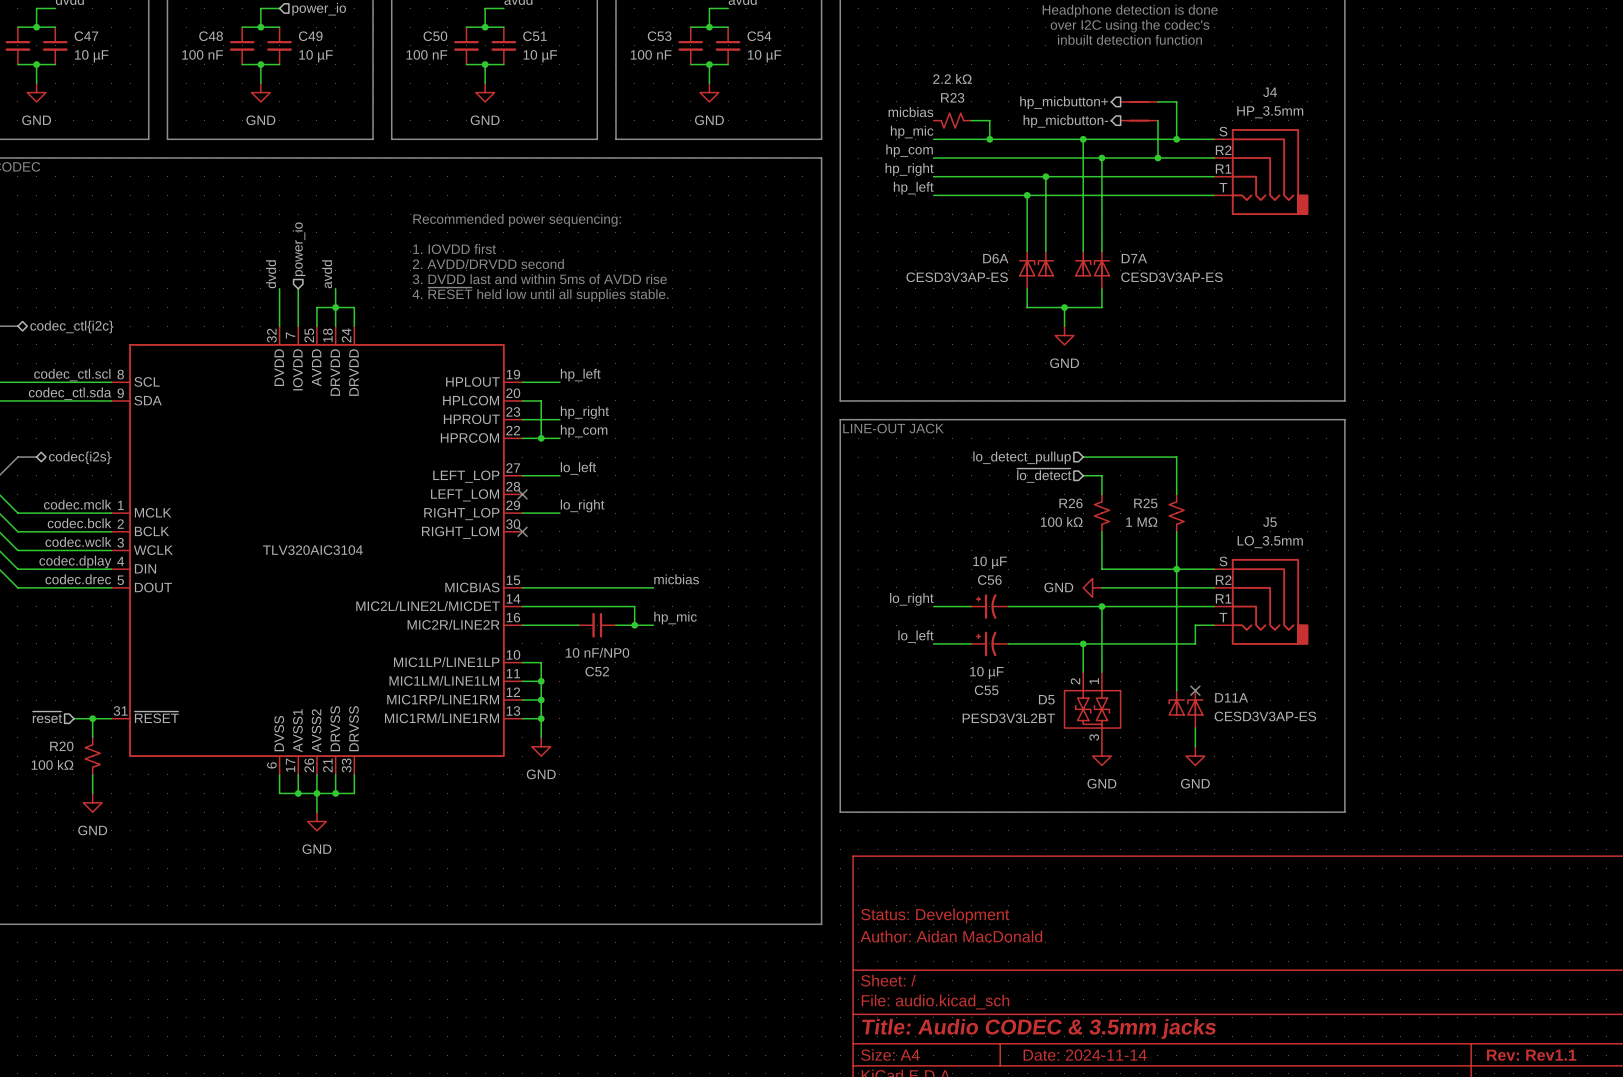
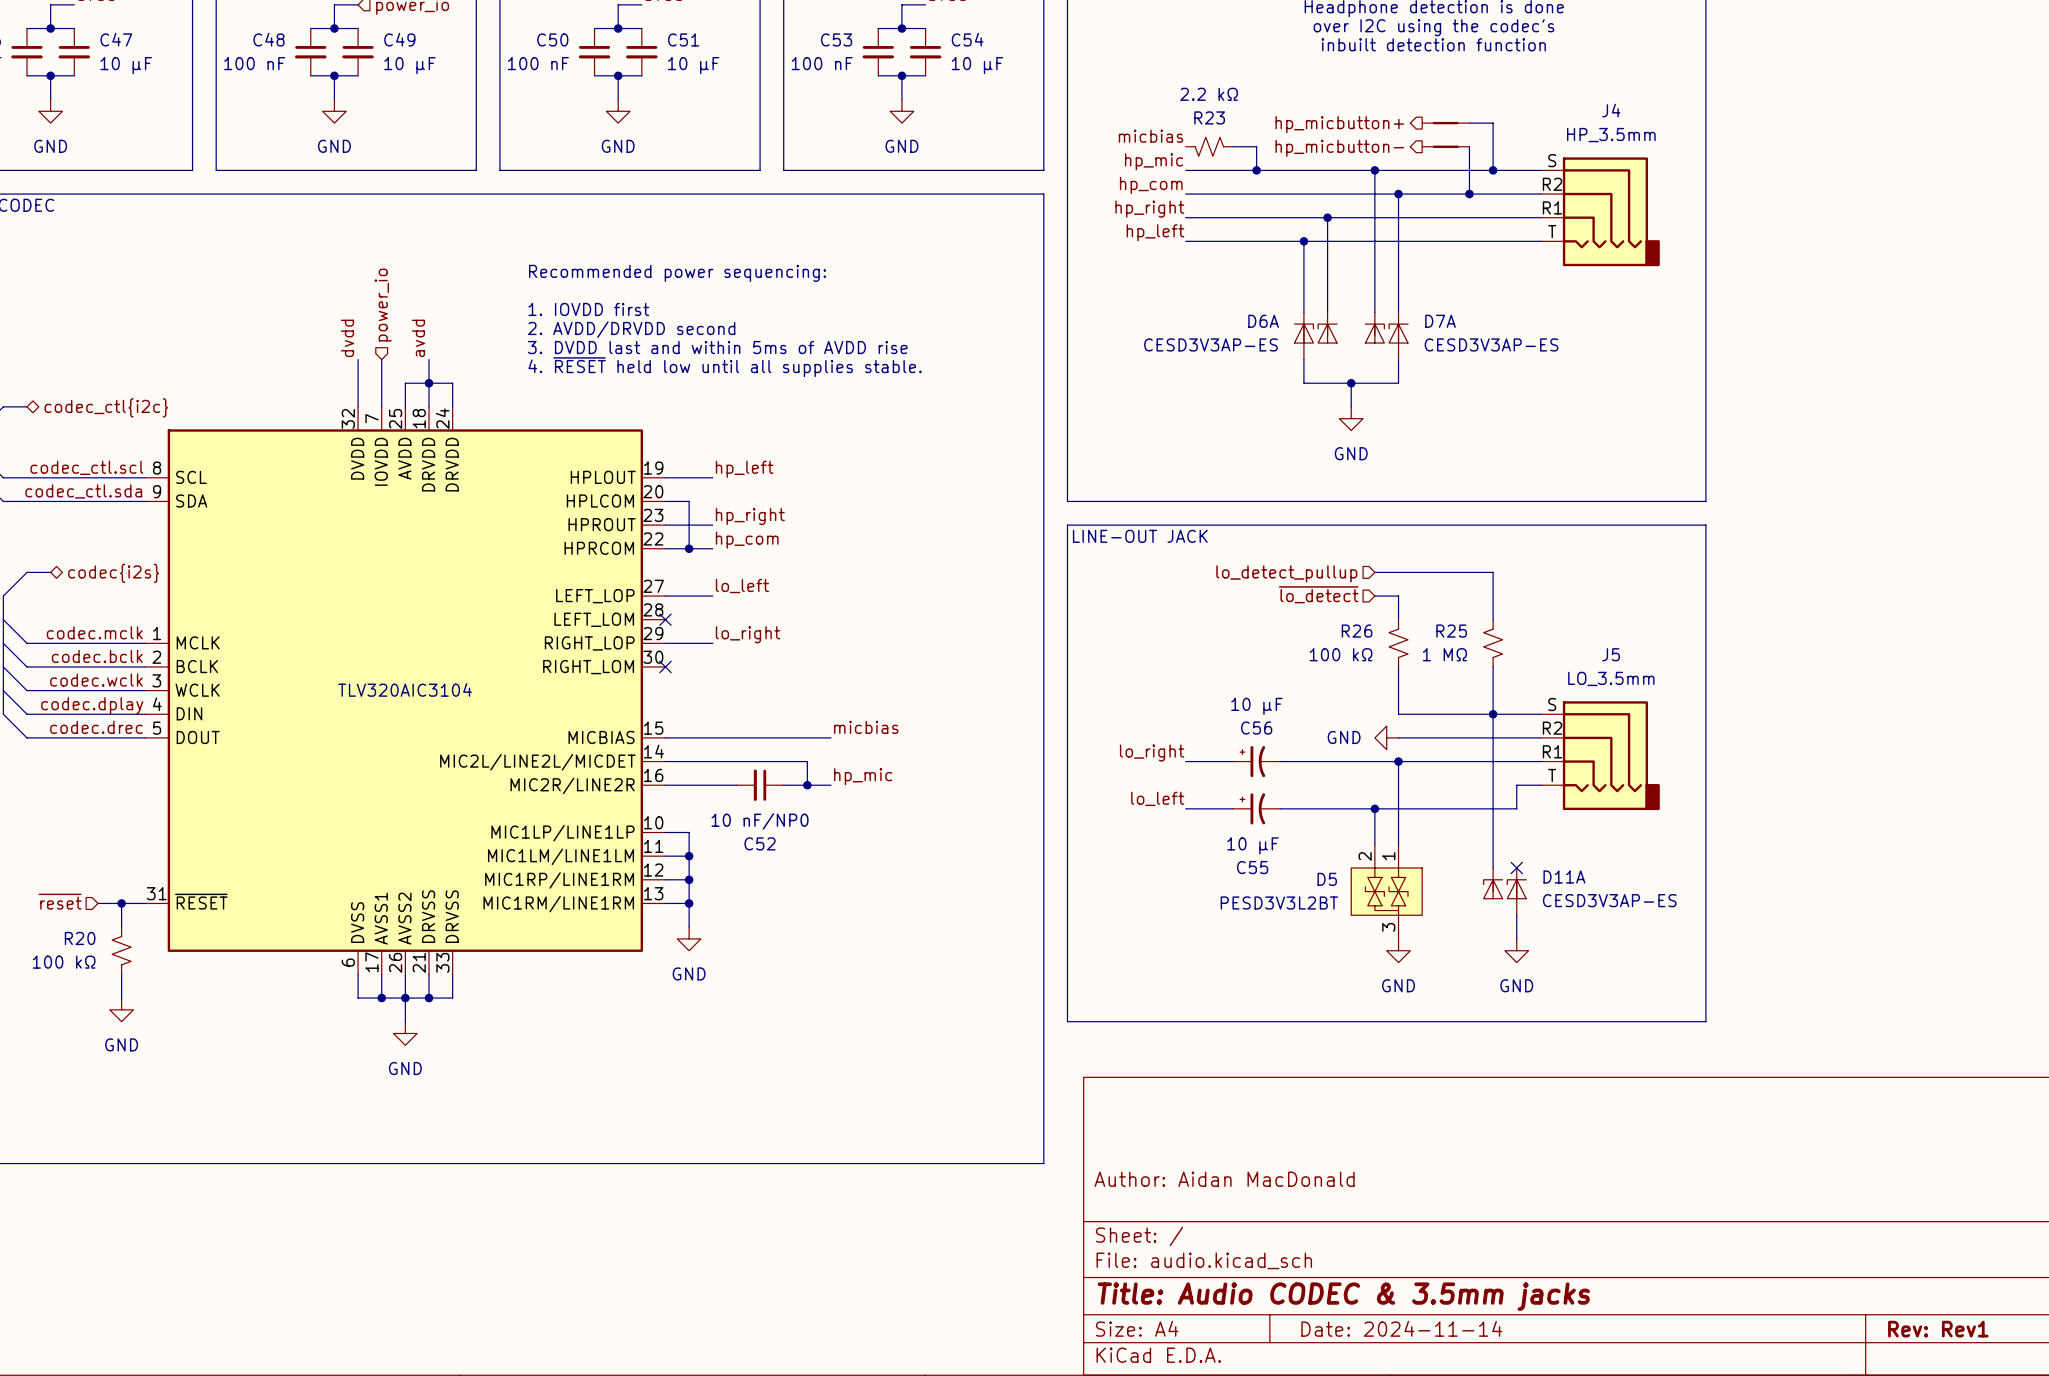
title block: Status: Development (935, 915) -> none
title block: Rev: Rev1.1 (1531, 1055) -> Rev: Rev1 (1938, 1329)

